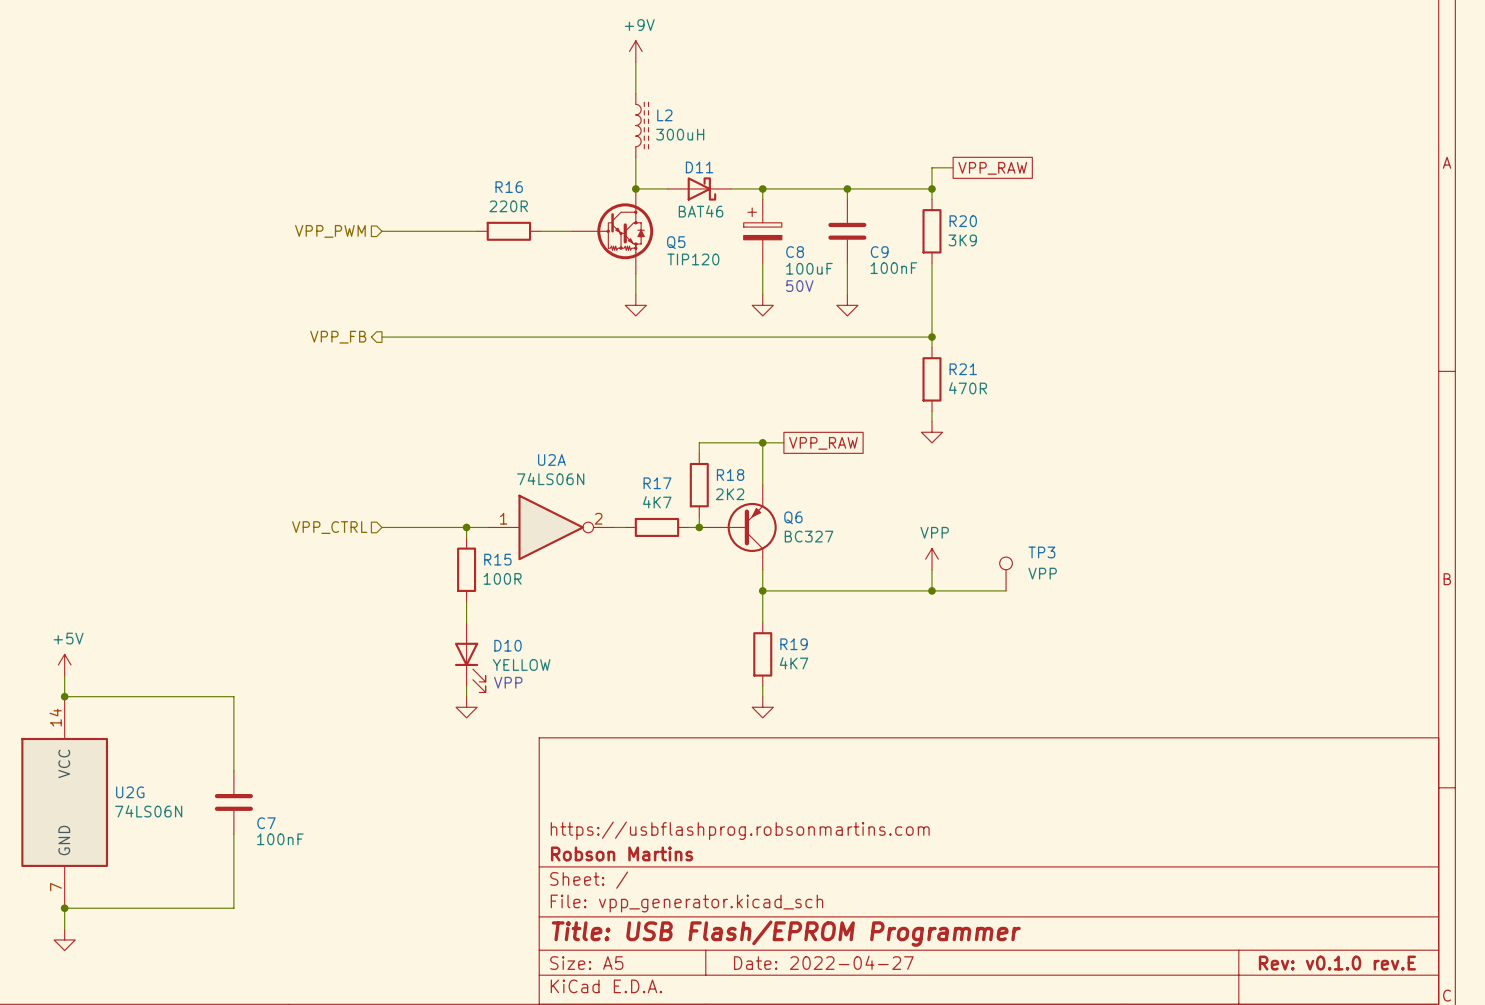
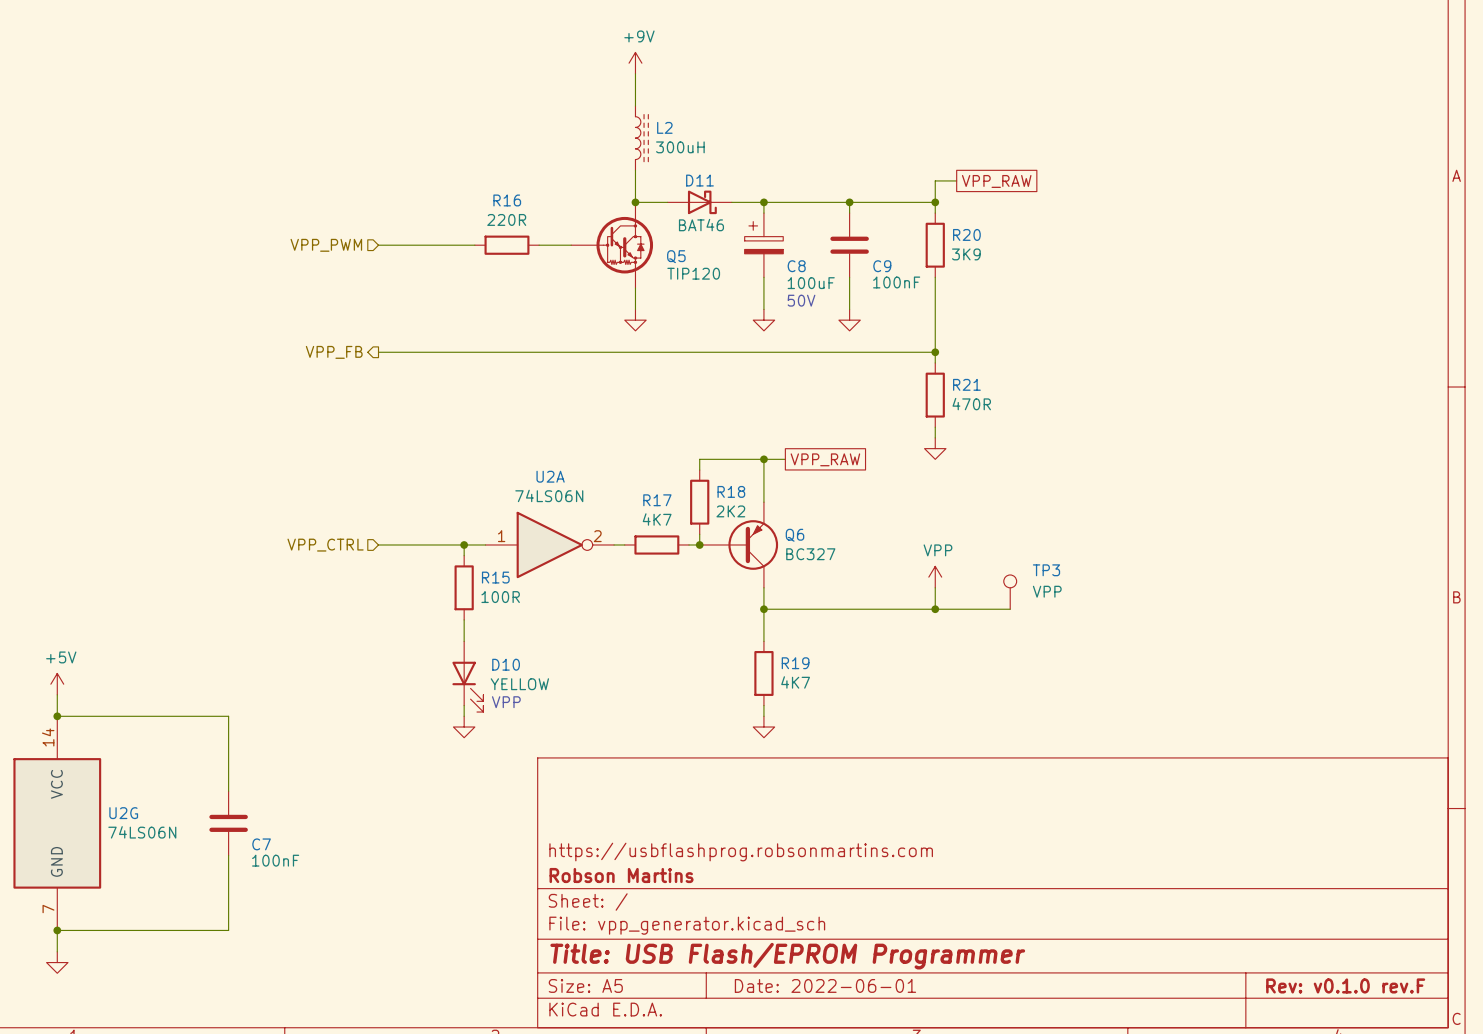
title block: Date: 2022-04-27 (823, 962) -> Date: 2022-06-01 (825, 985)
title block: Rev: v0.1.0 rev.E (1337, 963) -> Rev: v0.1.0 rev.F (1345, 985)

